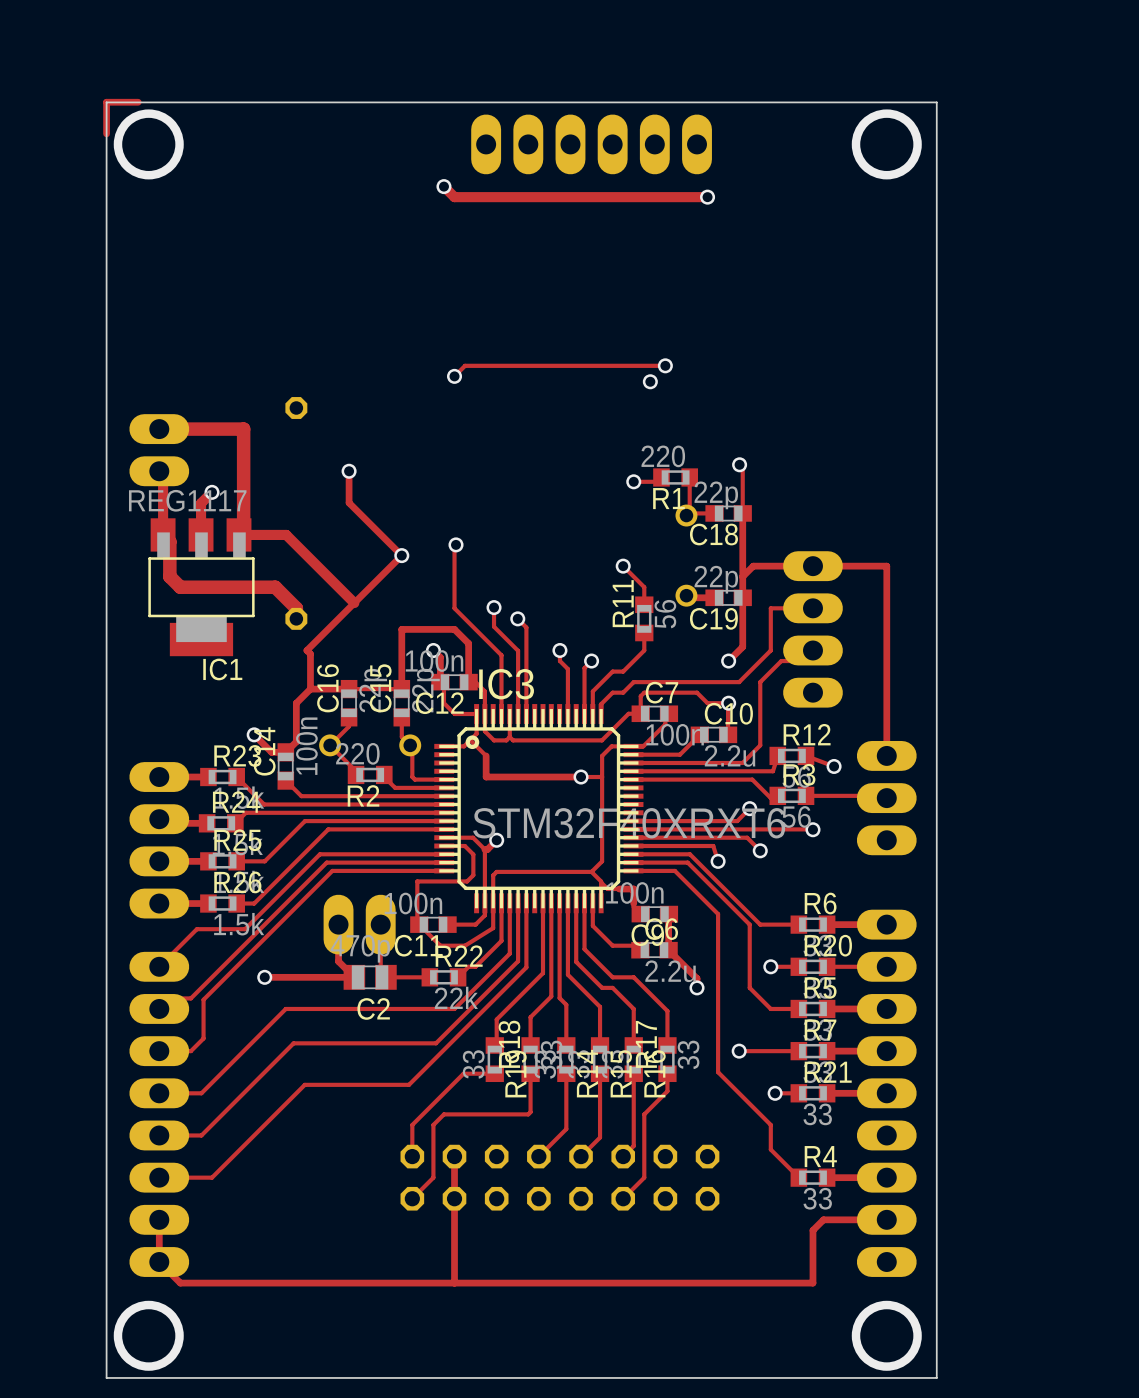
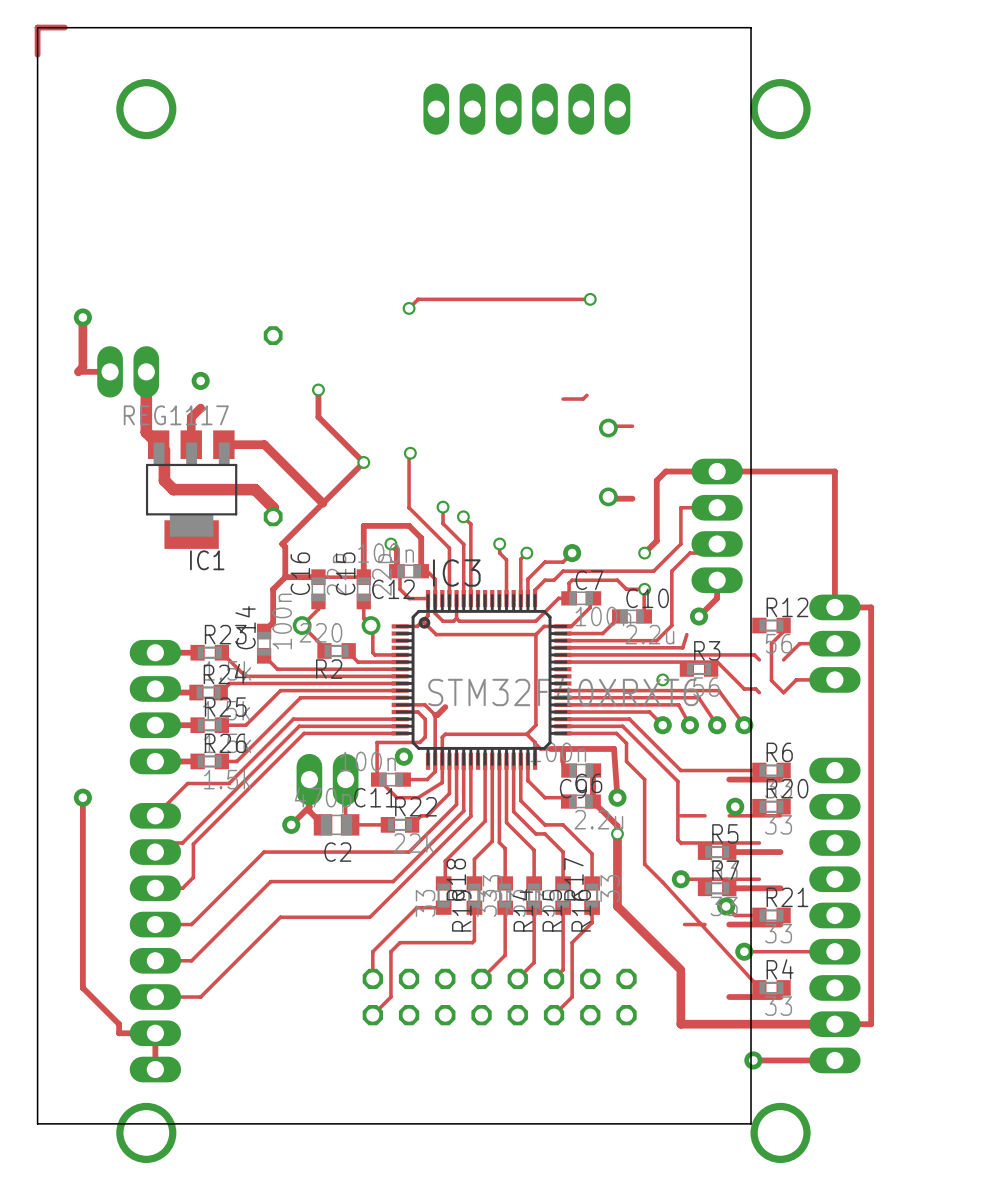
board edge: (106, 102) (936, 102) (936, 1377) (106, 1377) (106, 102) -> (37, 27) (751, 27) (751, 1123) (37, 1123) (37, 27)
track: (138, 102) (106, 102) (106, 133) -> (64, 27) (37, 27) (37, 54)
track: (443, 186) (454, 197) (707, 197) -> none
via: (443, 186) -> none
via: (707, 197) -> none
via: (650, 381) -> none
track: none -> (82, 317) (82, 367) (78, 371) (110, 371)
via: none -> (82, 317)
track: (159, 429) (243, 429) (243, 530) (239, 534) -> none
part rotation: 0° (159, 450) -> 90° clockwise (128, 371)
via: none -> (200, 380)
track: (739, 464) (742, 467) (742, 576) -> none
via: (739, 464) -> none
track: (159, 471) (163, 475) (163, 534) -> (146, 371) (146, 432) (158, 444)
R1: 220 (675, 477) -> none
track: (689, 477) (689, 512) (686, 515) -> none
via: (633, 481) -> none
via: (212, 492) -> none
C18: 22p (728, 513) -> none
track: (623, 566) (644, 587) (644, 604) -> none
via: (623, 566) -> none
track: (886, 566) (886, 755) -> (780, 471) (834, 471) (834, 607) (871, 607) (871, 1024) (680, 1024) (680, 972)
C19: 22p (728, 597) -> none
R11: 56 (644, 618) -> none
track: (644, 632) (644, 650) (623, 671) -> (572, 553) (563, 562) (554, 562)
via: none -> (572, 553)
track: none -> (717, 580) (717, 598) (699, 616)
track: (254, 734) (271, 752) (285, 752) -> none
via: (254, 734) -> none
via: none -> (699, 616)
track: none -> (783, 625) (783, 631) (771, 643) (771, 680) (783, 692) (796, 679) (834, 679)
track: (486, 755) (486, 777) (602, 777) -> (436, 634) (535, 634)
R12 position: (791, 755) -> (771, 625)
track: (806, 755) (834, 766) -> none
via: (834, 766) -> none
track: none -> (834, 643) (799, 643) (783, 659)
via: (581, 777) -> none
track: (752, 779) (770, 798) (777, 795) -> (664, 654) (754, 654) (759, 659)
track: none -> (562, 662) (717, 662) (744, 688) (755, 688) (759, 692)
track: (806, 795) (884, 795) (886, 798) -> none
part position: (886, 798) -> (834, 643)
track: (749, 808) (737, 821) -> (744, 725) (718, 690) (652, 690)
track: (791, 829) (812, 829) -> (698, 697) (717, 725)
via: (812, 829) -> none
track: (747, 837) (760, 850) -> (660, 704) (678, 704) (689, 725)
via: (496, 840) -> none
track: (713, 846) (718, 861) -> (631, 712) (649, 712) (662, 725)
via position: (760, 850) -> (662, 725)
track: (689, 854) (760, 924) (798, 924) -> (611, 719) (629, 719) (680, 770) (759, 770)
via: (718, 861) -> none
via: none -> (689, 725)
via: none -> (717, 725)
via: none -> (744, 725)
track: (687, 862) (696, 870) -> (598, 733) (616, 733)
track: none -> (609, 726) (622, 726) (677, 781) (677, 840) (680, 843) (759, 843)
track: (674, 870) (707, 903) -> (626, 743) (626, 761)
track: (707, 882) (749, 924) (749, 987) (770, 1008) (798, 1008) -> none
track: none -> (563, 748) (614, 748) (617, 797)
via: none -> (403, 756)
track: (718, 914) (718, 1072) (770, 1124) (770, 1146) -> (617, 833) (617, 906) (680, 969)
track: none -> (635, 770) (644, 779) (644, 864) (759, 987)
R6 position: (812, 924) -> (771, 770)
track: none -> (82, 797) (82, 987) (119, 1024) (119, 1033) (155, 1033)
via: none -> (82, 797)
via: none -> (617, 797)
track: none -> (309, 806) (291, 824)
via: none -> (735, 806)
via: (770, 966) -> none
R20 position: (812, 966) -> (771, 806)
track: (264, 977) (354, 977) -> none
via: (264, 977) -> none
via: none -> (291, 824)
track: none -> (680, 879) (759, 879)
via: none -> (680, 879)
track: (739, 1051) (798, 1051) -> none
via: (739, 1051) -> none
track: none -> (726, 906) (735, 915) (759, 915)
via: none -> (726, 906)
via: (775, 1093) -> none
R21 position: (812, 1093) -> (771, 915)
part position: (886, 1093) -> (834, 915)
track: none -> (744, 951) (834, 951)
via: none -> (744, 951)
track: (770, 1149) (798, 1177) -> none
track: (454, 1156) (454, 1283) -> none
R4 position: (812, 1177) -> (771, 987)
track: (886, 1219) (823, 1219) (812, 1230) (812, 1283) (180, 1283) (159, 1262) -> none
track: none -> (753, 1060) (834, 1060)
via: none -> (753, 1060)

